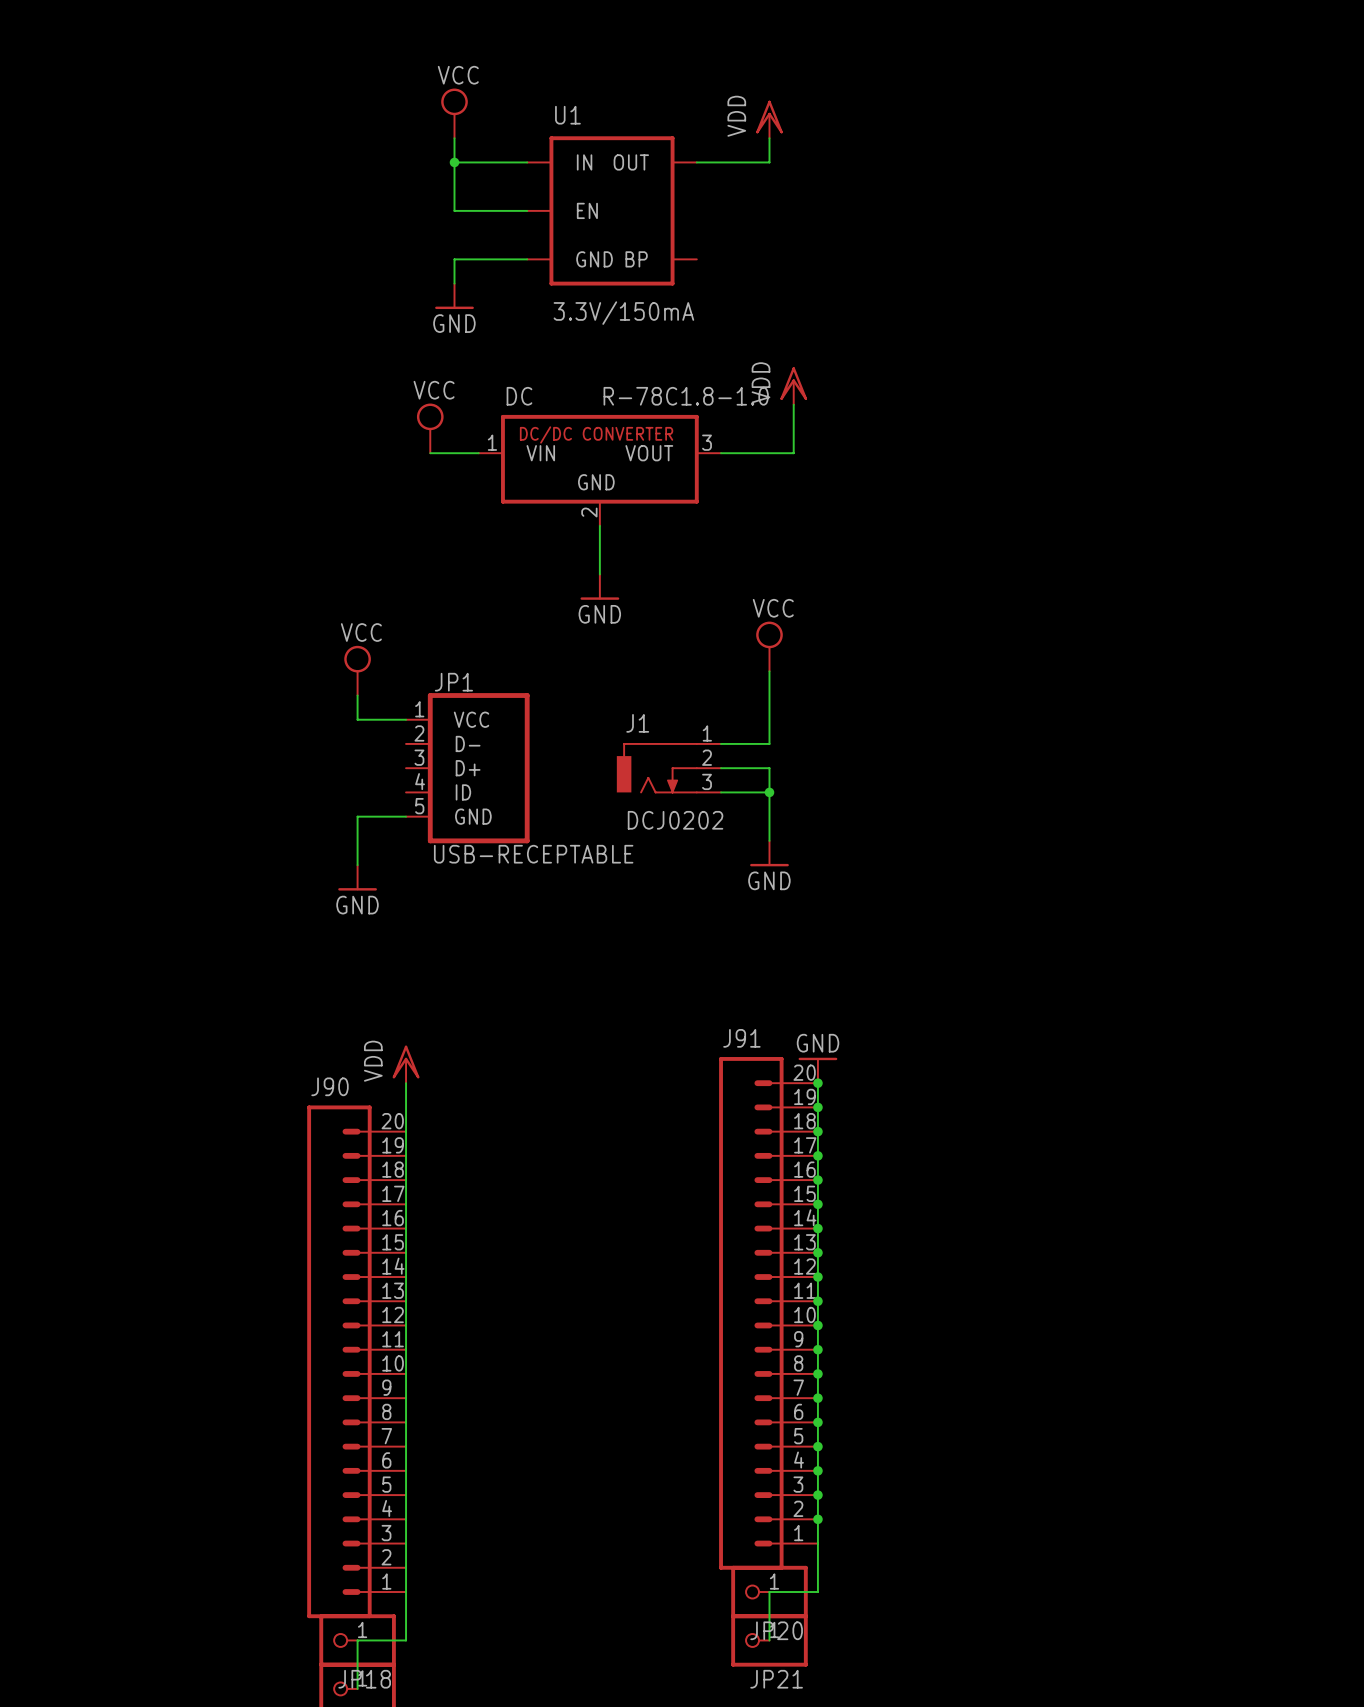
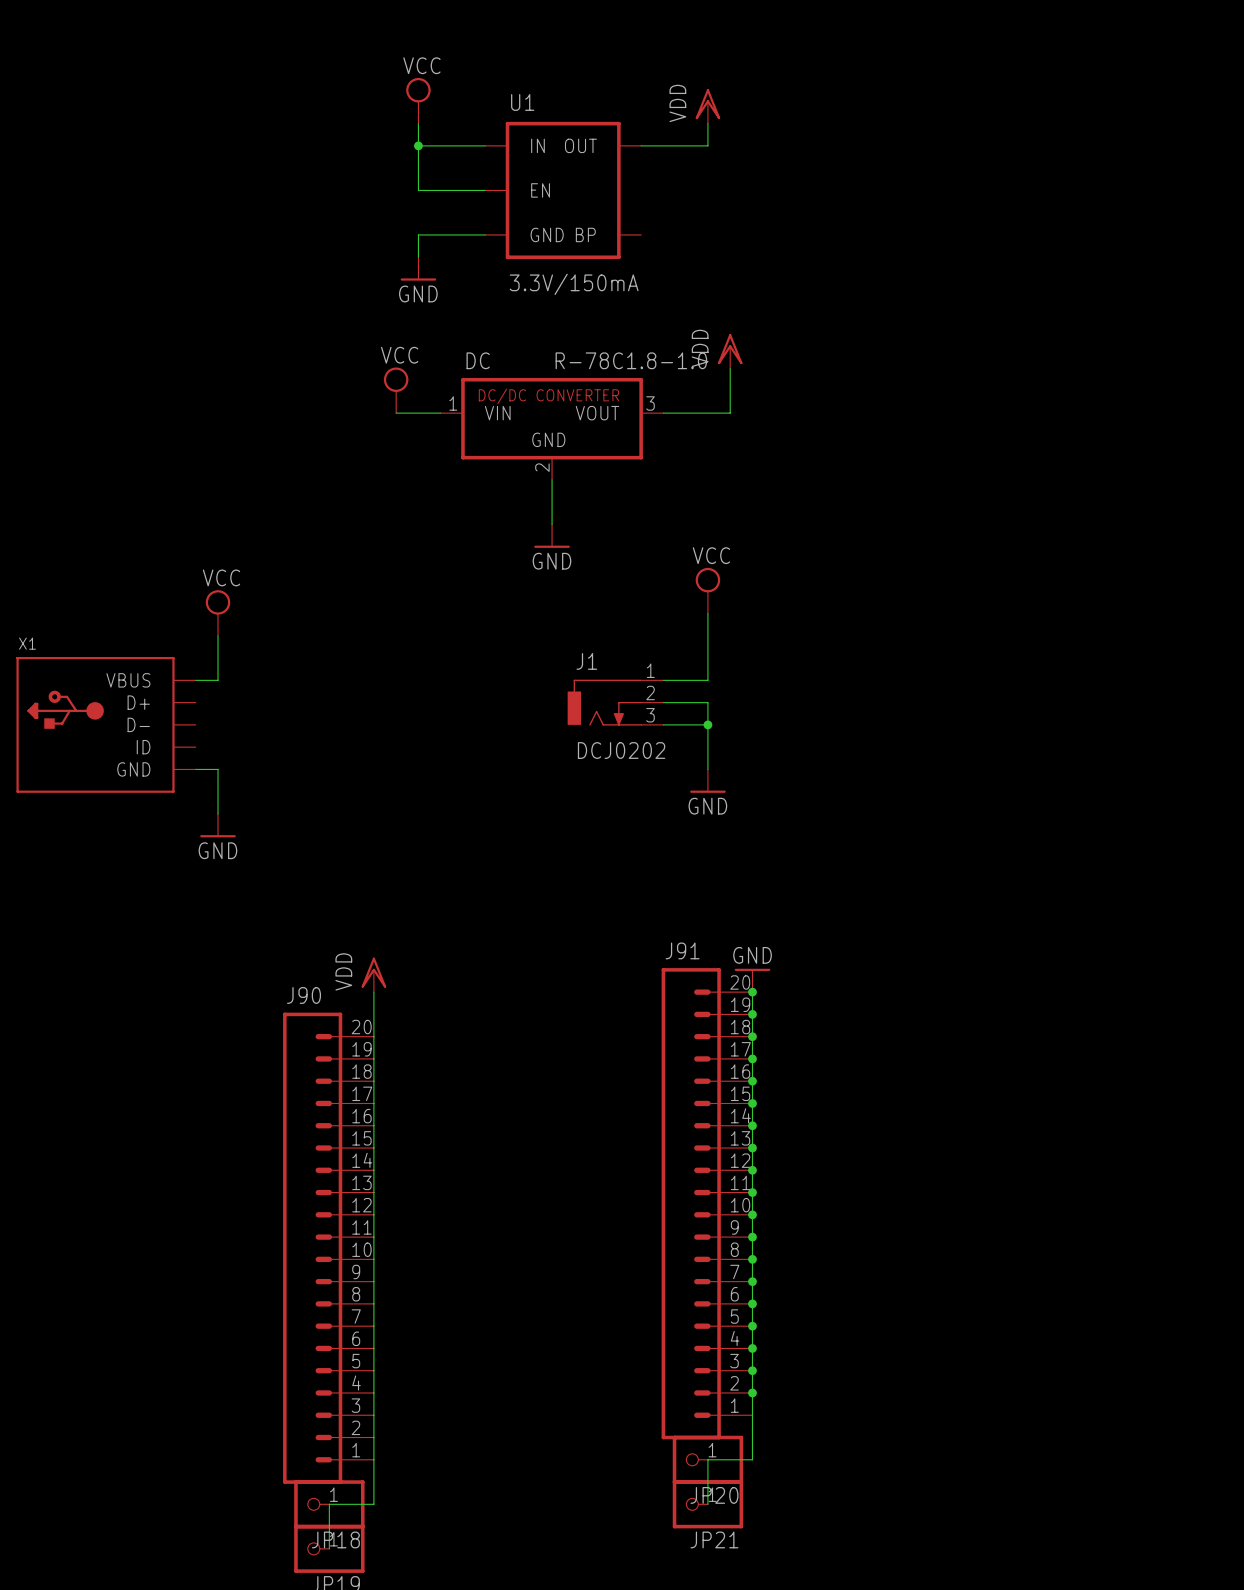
power symbol position: VCC (357, 670) -> VCC (218, 613)
wire: none -> (218, 635) (218, 680) (195, 680)
wire: (357, 695) (357, 719) (406, 719) -> none
JP1: USB-RECEPTABLE (467, 768) -> none
X1: none -> (105, 724)
wire: (406, 816) (357, 816) (357, 865) -> none
wire: none -> (195, 769) (218, 769) (218, 813)
power symbol position: GND (357, 877) -> GND (218, 825)

